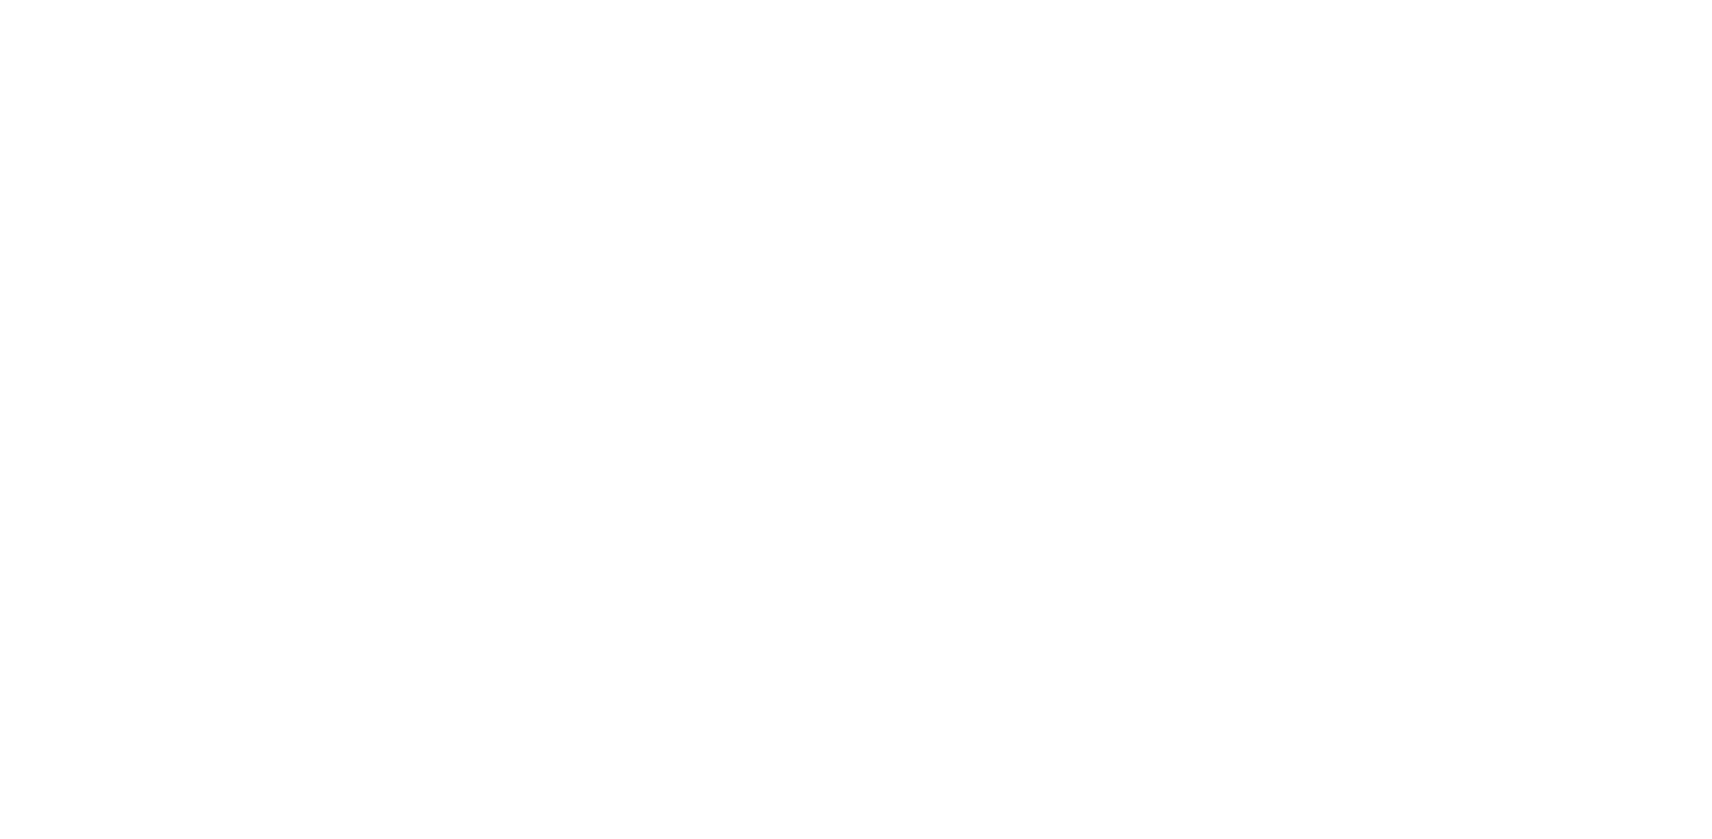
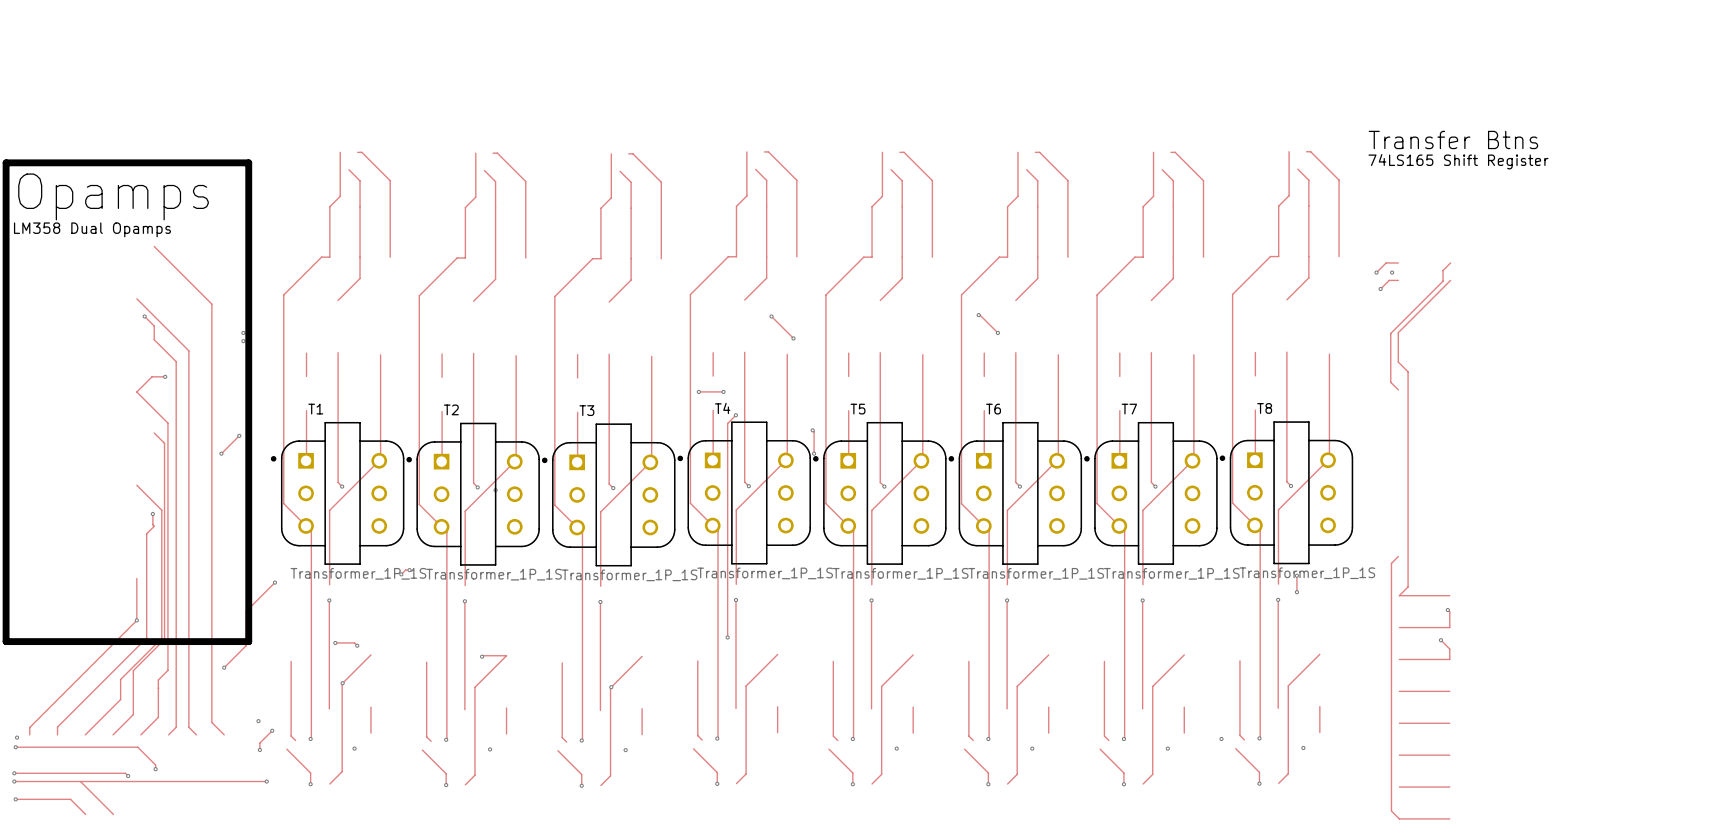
text: none -> Transfer Btns (1453, 139)
track: none -> (746, 151) (746, 195) (736, 206) (736, 256) (728, 256) (690, 294) (690, 503) (718, 530) (717, 738)
track: none -> (764, 151) (768, 151) (796, 180) (796, 256)
track: none -> (1289, 151) (1289, 195) (1278, 206) (1278, 256) (1270, 256) (1232, 294) (1232, 503) (1260, 530) (1259, 738)
track: none -> (1306, 151) (1310, 151) (1339, 180) (1339, 256)
track: none -> (340, 152) (340, 196) (329, 206) (329, 257) (321, 257) (283, 295) (283, 503) (311, 531) (310, 738)
track: none -> (357, 152) (361, 152) (390, 180) (390, 257)
track: none -> (882, 152) (882, 196) (872, 206) (872, 257) (863, 257) (825, 295) (825, 503) (853, 531) (852, 738)
track: none -> (899, 152) (904, 152) (932, 180) (932, 257)
track: none -> (1017, 152) (1017, 196) (1007, 206) (1007, 257) (999, 257) (961, 295) (961, 503) (989, 531) (988, 738)
track: none -> (1035, 152) (1039, 152) (1067, 180) (1067, 257)
track: none -> (1153, 152) (1153, 196) (1143, 206) (1143, 257) (1134, 257) (1097, 295) (1097, 503) (1124, 531) (1123, 738)
track: none -> (1170, 152) (1175, 152) (1203, 180) (1203, 257)
track: none -> (475, 153) (475, 197) (465, 207) (465, 257) (457, 257) (419, 295) (419, 504) (446, 532) (446, 739)
track: none -> (493, 153) (497, 153) (525, 181) (525, 257)
track: none -> (611, 153) (611, 197) (600, 208) (600, 258) (592, 258) (554, 296) (554, 505) (582, 532) (581, 740)
track: none -> (628, 153) (632, 153) (661, 182) (661, 258)
text: none -> 74LS165 Shift Register (1458, 161)
line: none -> (6, 162) (248, 162) (248, 641) (6, 641) (6, 162)
track: none -> (348, 169) (360, 180) (360, 278) (338, 300)
track: none -> (755, 169) (766, 180) (766, 278) (744, 300)
track: none -> (891, 169) (902, 180) (902, 278) (880, 300)
track: none -> (1026, 169) (1037, 180) (1037, 278) (1015, 300)
track: none -> (1162, 169) (1173, 180) (1173, 278) (1151, 300)
track: none -> (1297, 169) (1308, 180) (1308, 277) (1286, 299)
track: none -> (484, 170) (495, 181) (495, 279) (473, 301)
track: none -> (620, 171) (631, 182) (631, 280) (609, 301)
text: none -> Opamps (113, 196)
text: none -> LM358 Dual Opamps (92, 229)
track: none -> (154, 246) (211, 304) (211, 722) (224, 734)
track: none -> (1398, 262) (1386, 262) (1376, 272)
track: none -> (1450, 262) (1443, 270) (1443, 281) (1390, 333) (1390, 382) (1398, 389)
via: none -> (1376, 272)
via: none -> (1392, 272)
track: none -> (1398, 280) (1389, 280) (1380, 289)
track: none -> (1450, 280) (1398, 332) (1398, 362) (1408, 371) (1408, 586) (1399, 595) (1449, 595)
via: none -> (1380, 289)
track: none -> (136, 298) (188, 350) (188, 727) (196, 734)
track: none -> (978, 315) (997, 332)
via: none -> (978, 315)
track: none -> (144, 316) (154, 326) (154, 339) (176, 361) (176, 727) (168, 734)
via: none -> (144, 316)
track: none -> (771, 316) (793, 338)
via: none -> (771, 316)
via: none -> (243, 332)
via: none -> (997, 332)
via: none -> (793, 338)
via: none -> (243, 341)
track: none -> (338, 352) (338, 482) (342, 486)
track: none -> (713, 352) (713, 376)
track: none -> (744, 352) (744, 482) (748, 486)
track: none -> (880, 352) (880, 482) (884, 486)
track: none -> (1015, 352) (1015, 482) (1019, 486)
track: none -> (1151, 352) (1151, 482) (1155, 486)
track: none -> (1255, 352) (1255, 375)
track: none -> (1286, 352) (1286, 481) (1291, 485)
track: none -> (306, 353) (306, 376)
track: none -> (442, 353) (442, 377)
track: none -> (473, 353) (473, 483) (477, 487)
track: none -> (848, 353) (848, 376)
track: none -> (984, 353) (984, 376)
track: none -> (1119, 353) (1119, 376)
track: none -> (380, 354) (380, 459) (329, 510) (329, 584)
track: none -> (577, 354) (577, 377)
track: none -> (609, 354) (609, 484) (613, 488)
track: none -> (787, 354) (787, 459) (736, 510) (736, 584)
track: none -> (922, 354) (922, 459) (871, 510) (871, 584)
track: none -> (1058, 354) (1058, 459) (1007, 510) (1007, 584)
track: none -> (1193, 354) (1193, 459) (1142, 510) (1142, 584)
track: none -> (1329, 354) (1329, 458) (1278, 509) (1278, 584)
track: none -> (516, 355) (516, 460) (465, 511) (465, 585)
track: none -> (651, 356) (651, 460) (600, 511) (600, 586)
track: none -> (165, 376) (152, 376) (136, 392) (167, 423) (167, 670) (158, 680) (158, 717) (140, 734)
via: none -> (165, 376)
track: none -> (698, 391) (723, 391)
via: none -> (698, 391)
via: none -> (723, 391)
track: none -> (306, 410) (306, 460)
track: none -> (713, 410) (712, 460)
track: none -> (848, 410) (848, 460)
track: none -> (984, 410) (983, 460)
track: none -> (1119, 410) (1119, 460)
track: none -> (1255, 410) (1254, 460)
track: none -> (442, 411) (441, 461)
track: none -> (577, 412) (577, 462)
track: none -> (735, 415) (727, 423) (727, 637)
via: none -> (735, 415)
track: none -> (812, 430) (814, 453)
via: none -> (812, 430)
track: none -> (154, 433) (164, 443) (164, 639) (133, 670) (133, 714) (113, 734)
track: none -> (239, 435) (221, 453)
via: none -> (239, 435)
via: none -> (221, 453)
via: none -> (814, 453)
track: none -> (136, 485) (161, 510) (161, 638) (120, 679) (120, 699) (85, 734)
via: none -> (1291, 485)
via: none -> (342, 486)
via: none -> (748, 486)
via: none -> (884, 486)
via: none -> (1019, 486)
via: none -> (1155, 486)
via: none -> (477, 487)
via: none -> (613, 488)
via: none -> (495, 490)
T8: none -> Transformer_1P_1S (1286, 492)
T1: none -> Transformer_1P_1S (337, 493)
T4: none -> Transformer_1P_1S (744, 493)
T5: none -> Transformer_1P_1S (879, 493)
T6: none -> Transformer_1P_1S (1015, 493)
T7: none -> Transformer_1P_1S (1150, 493)
T2: none -> Transformer_1P_1S (473, 494)
T3: none -> Transformer_1P_1S (608, 494)
track: none -> (152, 514) (154, 526) (146, 533) (146, 637) (57, 727) (57, 734)
via: none -> (152, 514)
track: none -> (1398, 556) (1391, 563) (1391, 811) (1399, 818) (1449, 818)
track: none -> (409, 570) (405, 570) (401, 574)
via: none -> (409, 570)
via: none -> (401, 574)
track: none -> (1296, 575) (1296, 592)
via: none -> (1296, 575)
track: none -> (136, 578) (136, 620) (29, 727) (29, 734)
track: none -> (274, 582) (246, 611) (246, 645) (224, 667)
via: none -> (274, 582)
via: none -> (1296, 592)
track: none -> (1278, 599) (1278, 708)
via: none -> (1278, 599)
track: none -> (329, 600) (329, 708)
via: none -> (329, 600)
track: none -> (735, 600) (735, 708)
via: none -> (735, 600)
track: none -> (871, 600) (871, 708)
via: none -> (871, 600)
track: none -> (1007, 600) (1007, 708)
via: none -> (1007, 600)
track: none -> (1142, 600) (1142, 708)
via: none -> (1142, 600)
track: none -> (464, 601) (464, 709)
via: none -> (464, 601)
track: none -> (600, 601) (600, 710)
via: none -> (600, 601)
track: none -> (1447, 610) (1449, 611) (1449, 627) (1399, 627)
via: none -> (1447, 610)
via: none -> (136, 620)
via: none -> (727, 637)
track: none -> (1440, 640) (1449, 649) (1449, 659) (1399, 659)
via: none -> (1440, 640)
track: none -> (335, 642) (354, 642) (357, 645)
via: none -> (335, 642)
via: none -> (357, 645)
track: none -> (370, 654) (342, 683) (342, 771) (329, 784)
track: none -> (777, 654) (746, 686) (746, 774) (736, 783)
track: none -> (913, 654) (881, 686) (881, 774) (872, 784)
track: none -> (1048, 654) (1017, 686) (1017, 774) (1007, 784)
track: none -> (1184, 654) (1152, 686) (1152, 774) (1143, 784)
track: none -> (1319, 654) (1288, 685) (1288, 773) (1278, 783)
track: none -> (482, 656) (506, 655) (474, 687) (474, 775) (465, 784)
via: none -> (482, 656)
track: none -> (642, 656) (610, 688) (610, 775) (600, 785)
track: none -> (1239, 660) (1239, 735) (1244, 739)
track: none -> (291, 661) (291, 736) (295, 740)
track: none -> (697, 661) (697, 735) (702, 740)
track: none -> (833, 661) (833, 736) (837, 740)
track: none -> (968, 661) (968, 736) (973, 740)
track: none -> (1104, 661) (1104, 736) (1108, 740)
track: none -> (426, 662) (426, 736) (431, 741)
track: none -> (562, 662) (562, 737) (566, 742)
via: none -> (224, 667)
via: none -> (342, 683)
via: none -> (611, 687)
track: none -> (1399, 691) (1449, 691)
track: none -> (777, 706) (777, 732)
track: none -> (1319, 706) (1319, 732)
track: none -> (370, 707) (370, 733)
track: none -> (913, 707) (913, 733)
track: none -> (1048, 707) (1048, 733)
track: none -> (1184, 707) (1184, 733)
track: none -> (506, 708) (506, 733)
track: none -> (642, 708) (642, 734)
via: none -> (258, 721)
track: none -> (1399, 723) (1449, 723)
track: none -> (272, 730) (259, 743) (259, 749)
via: none -> (272, 730)
via: none -> (17, 737)
via: none -> (310, 738)
via: none -> (717, 738)
via: none -> (852, 738)
via: none -> (988, 738)
via: none -> (1123, 738)
via: none -> (1221, 738)
via: none -> (1259, 738)
via: none -> (446, 739)
via: none -> (581, 740)
track: none -> (15, 747) (137, 747) (155, 765) (155, 769)
via: none -> (15, 747)
via: none -> (354, 748)
track: none -> (693, 748) (717, 772) (717, 783)
via: none -> (896, 748)
via: none -> (1032, 748)
via: none -> (1167, 748)
track: none -> (1235, 748) (1259, 772) (1259, 783)
via: none -> (1303, 748)
via: none -> (259, 749)
track: none -> (286, 749) (310, 772) (310, 784)
via: none -> (490, 749)
track: none -> (829, 749) (852, 772) (852, 784)
track: none -> (964, 749) (988, 772) (988, 784)
track: none -> (1100, 749) (1123, 772) (1123, 784)
track: none -> (422, 750) (446, 773) (446, 785)
track: none -> (557, 750) (581, 774) (581, 785)
via: none -> (625, 750)
track: none -> (1399, 755) (1449, 755)
via: none -> (155, 769)
track: none -> (14, 773) (125, 773) (128, 776)
via: none -> (14, 773)
via: none -> (128, 776)
track: none -> (14, 781) (266, 781)
via: none -> (14, 781)
track: none -> (80, 781) (113, 814)
via: none -> (266, 781)
via: none -> (717, 783)
via: none -> (1259, 783)
via: none -> (310, 784)
via: none -> (852, 784)
via: none -> (988, 784)
via: none -> (1123, 784)
via: none -> (446, 785)
via: none -> (581, 785)
track: none -> (1399, 787) (1449, 787)
track: none -> (15, 799) (70, 799) (85, 814)
via: none -> (15, 799)

